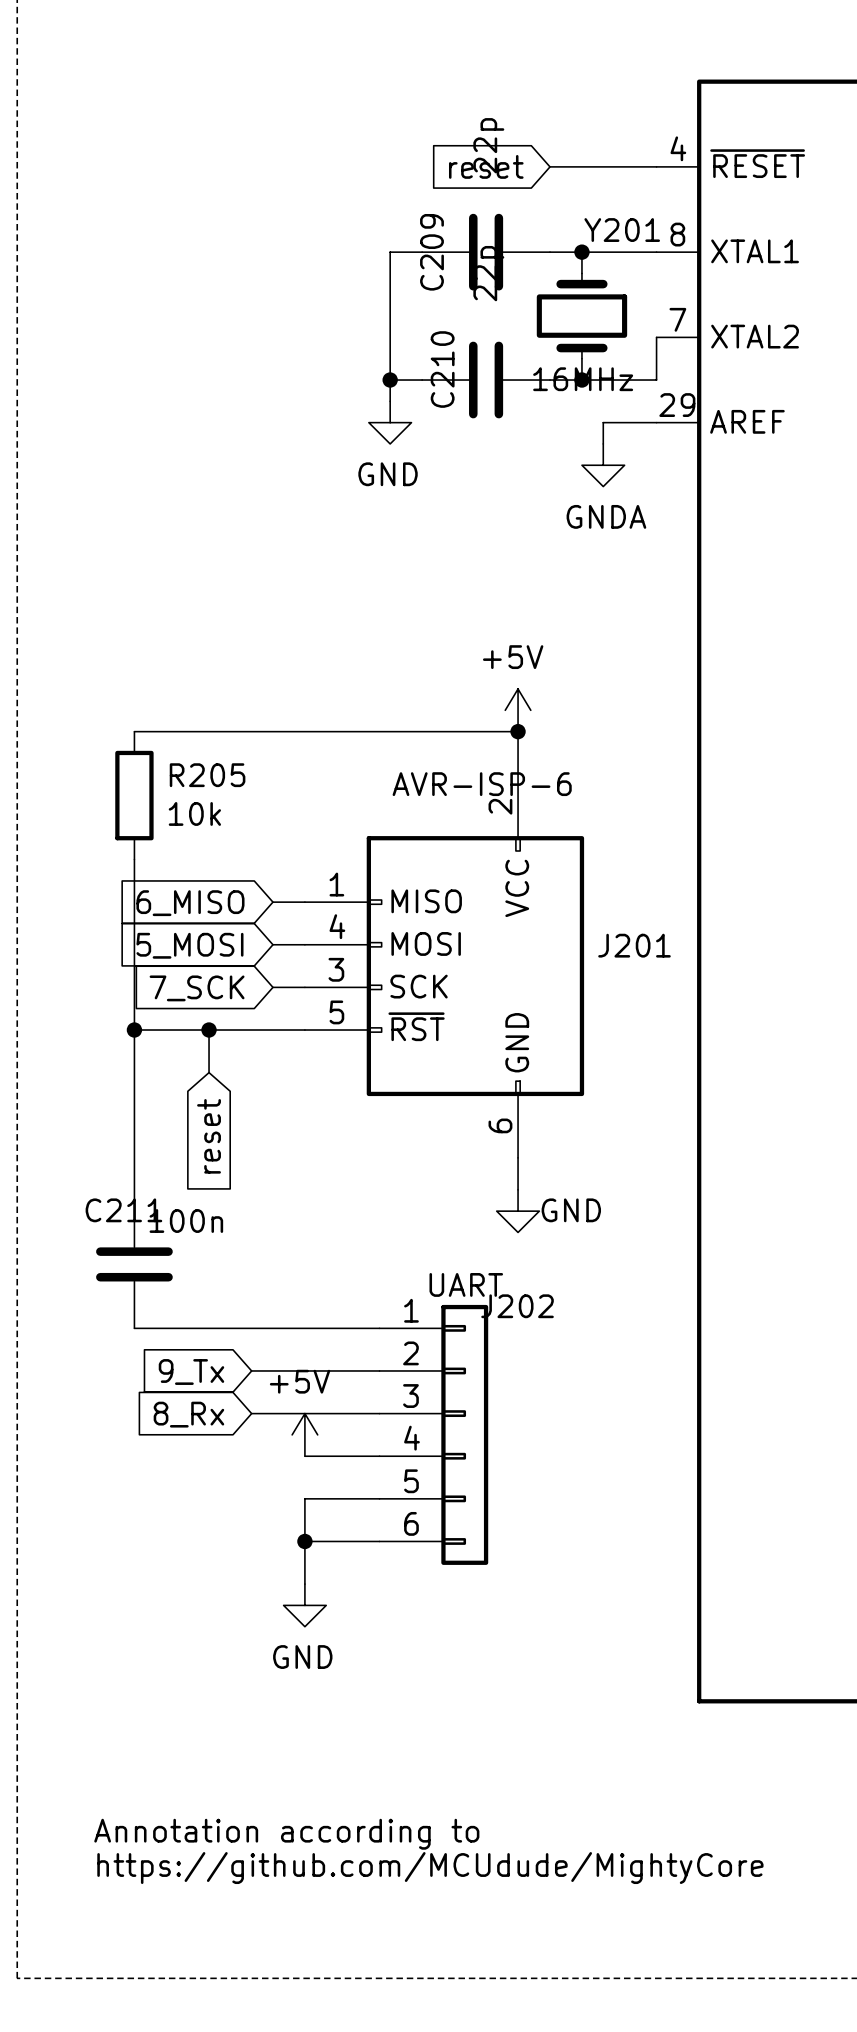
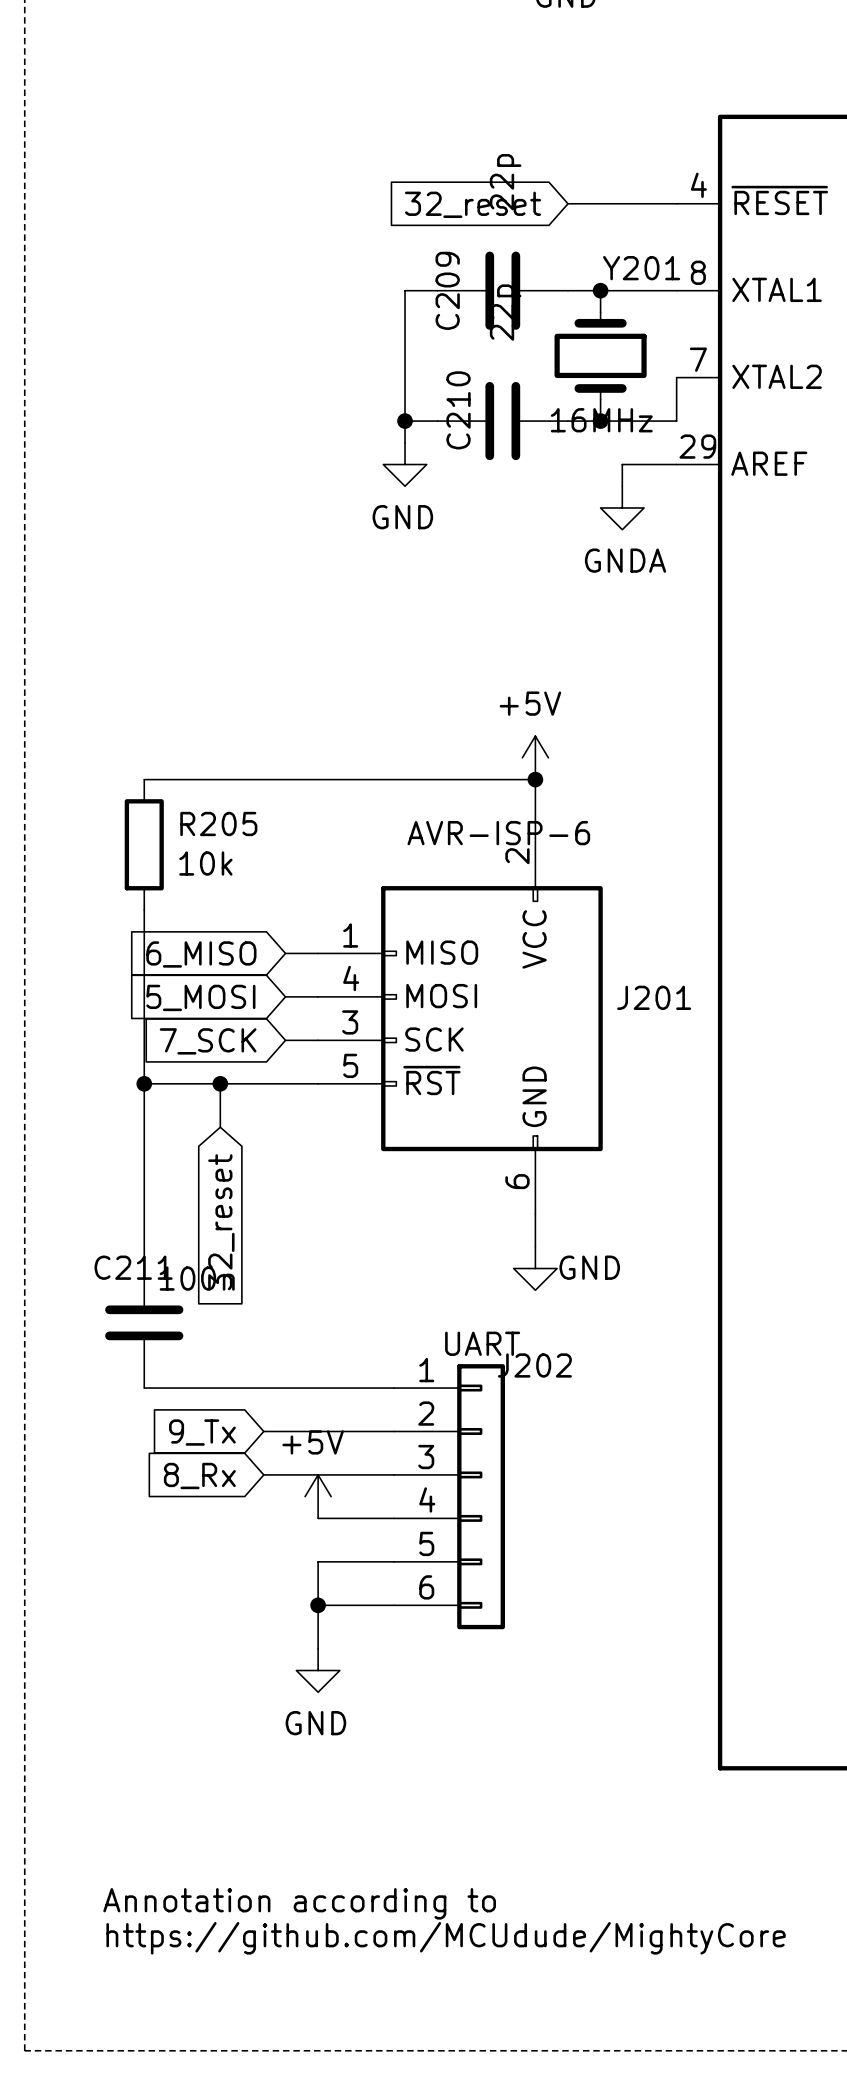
global label: reset (486, 166) -> 32_reset (473, 204)
global label: reset (209, 1136) -> 32_reset (221, 1222)

